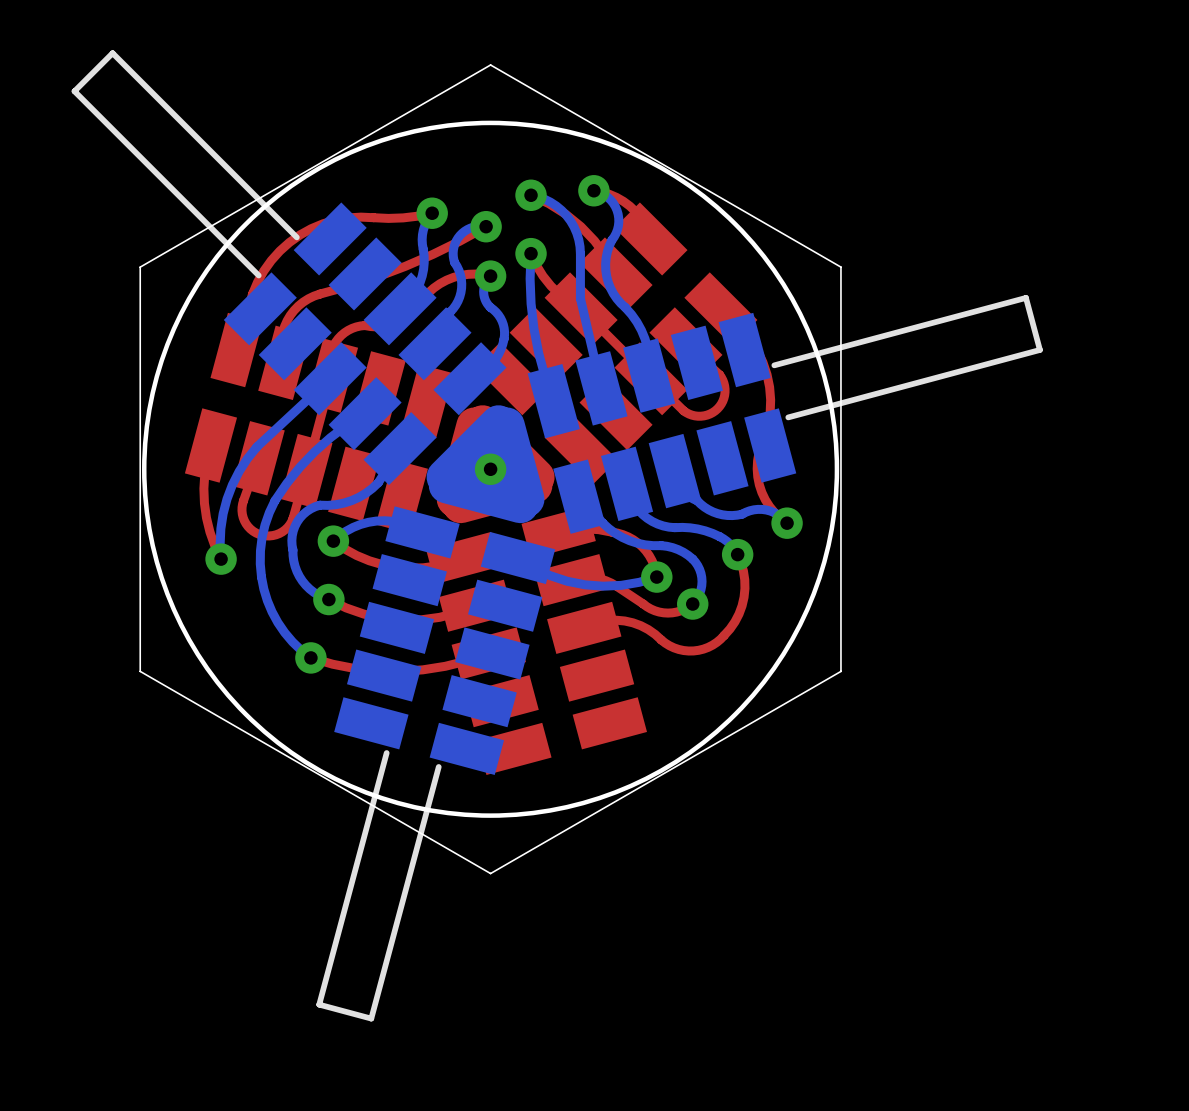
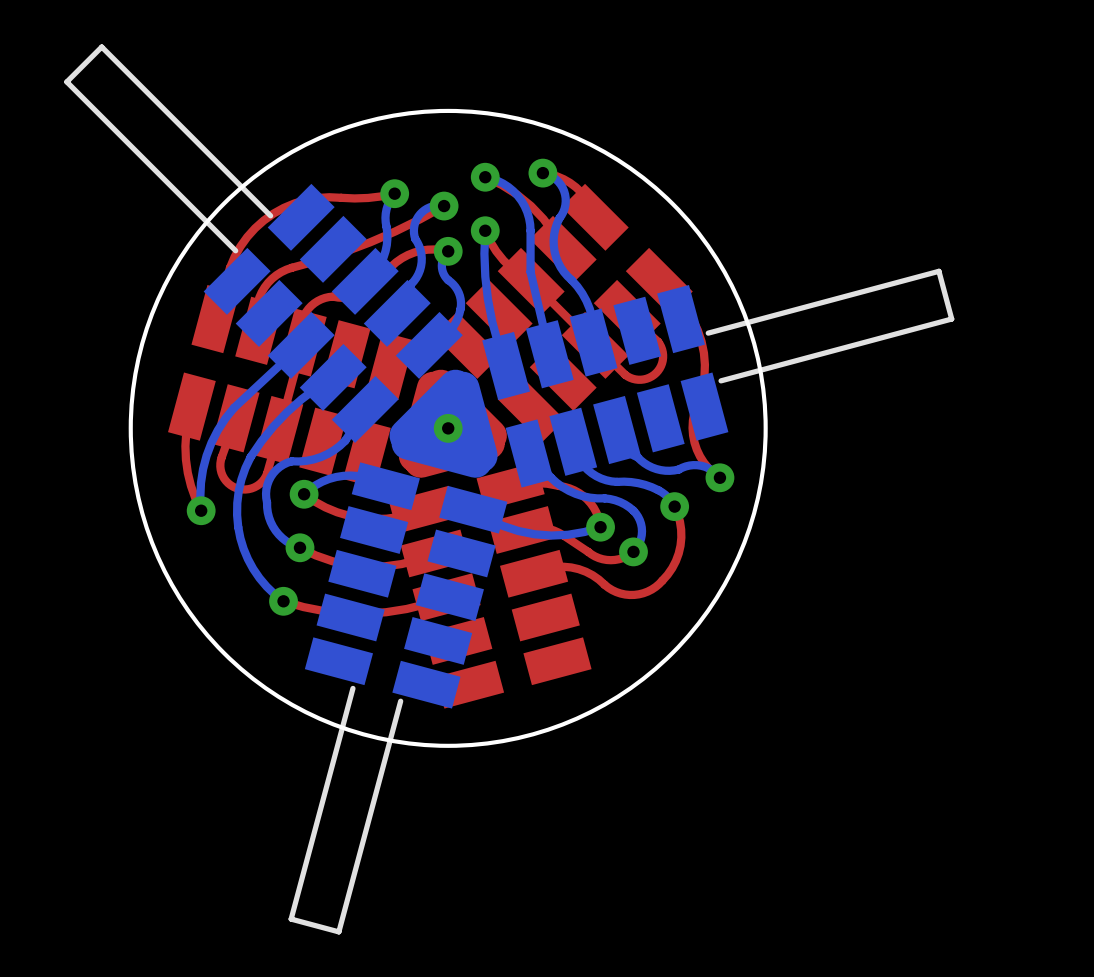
board edge: (490, 64) (140, 267) (140, 671) (490, 873) (840, 671) (840, 267) (490, 64) -> none

